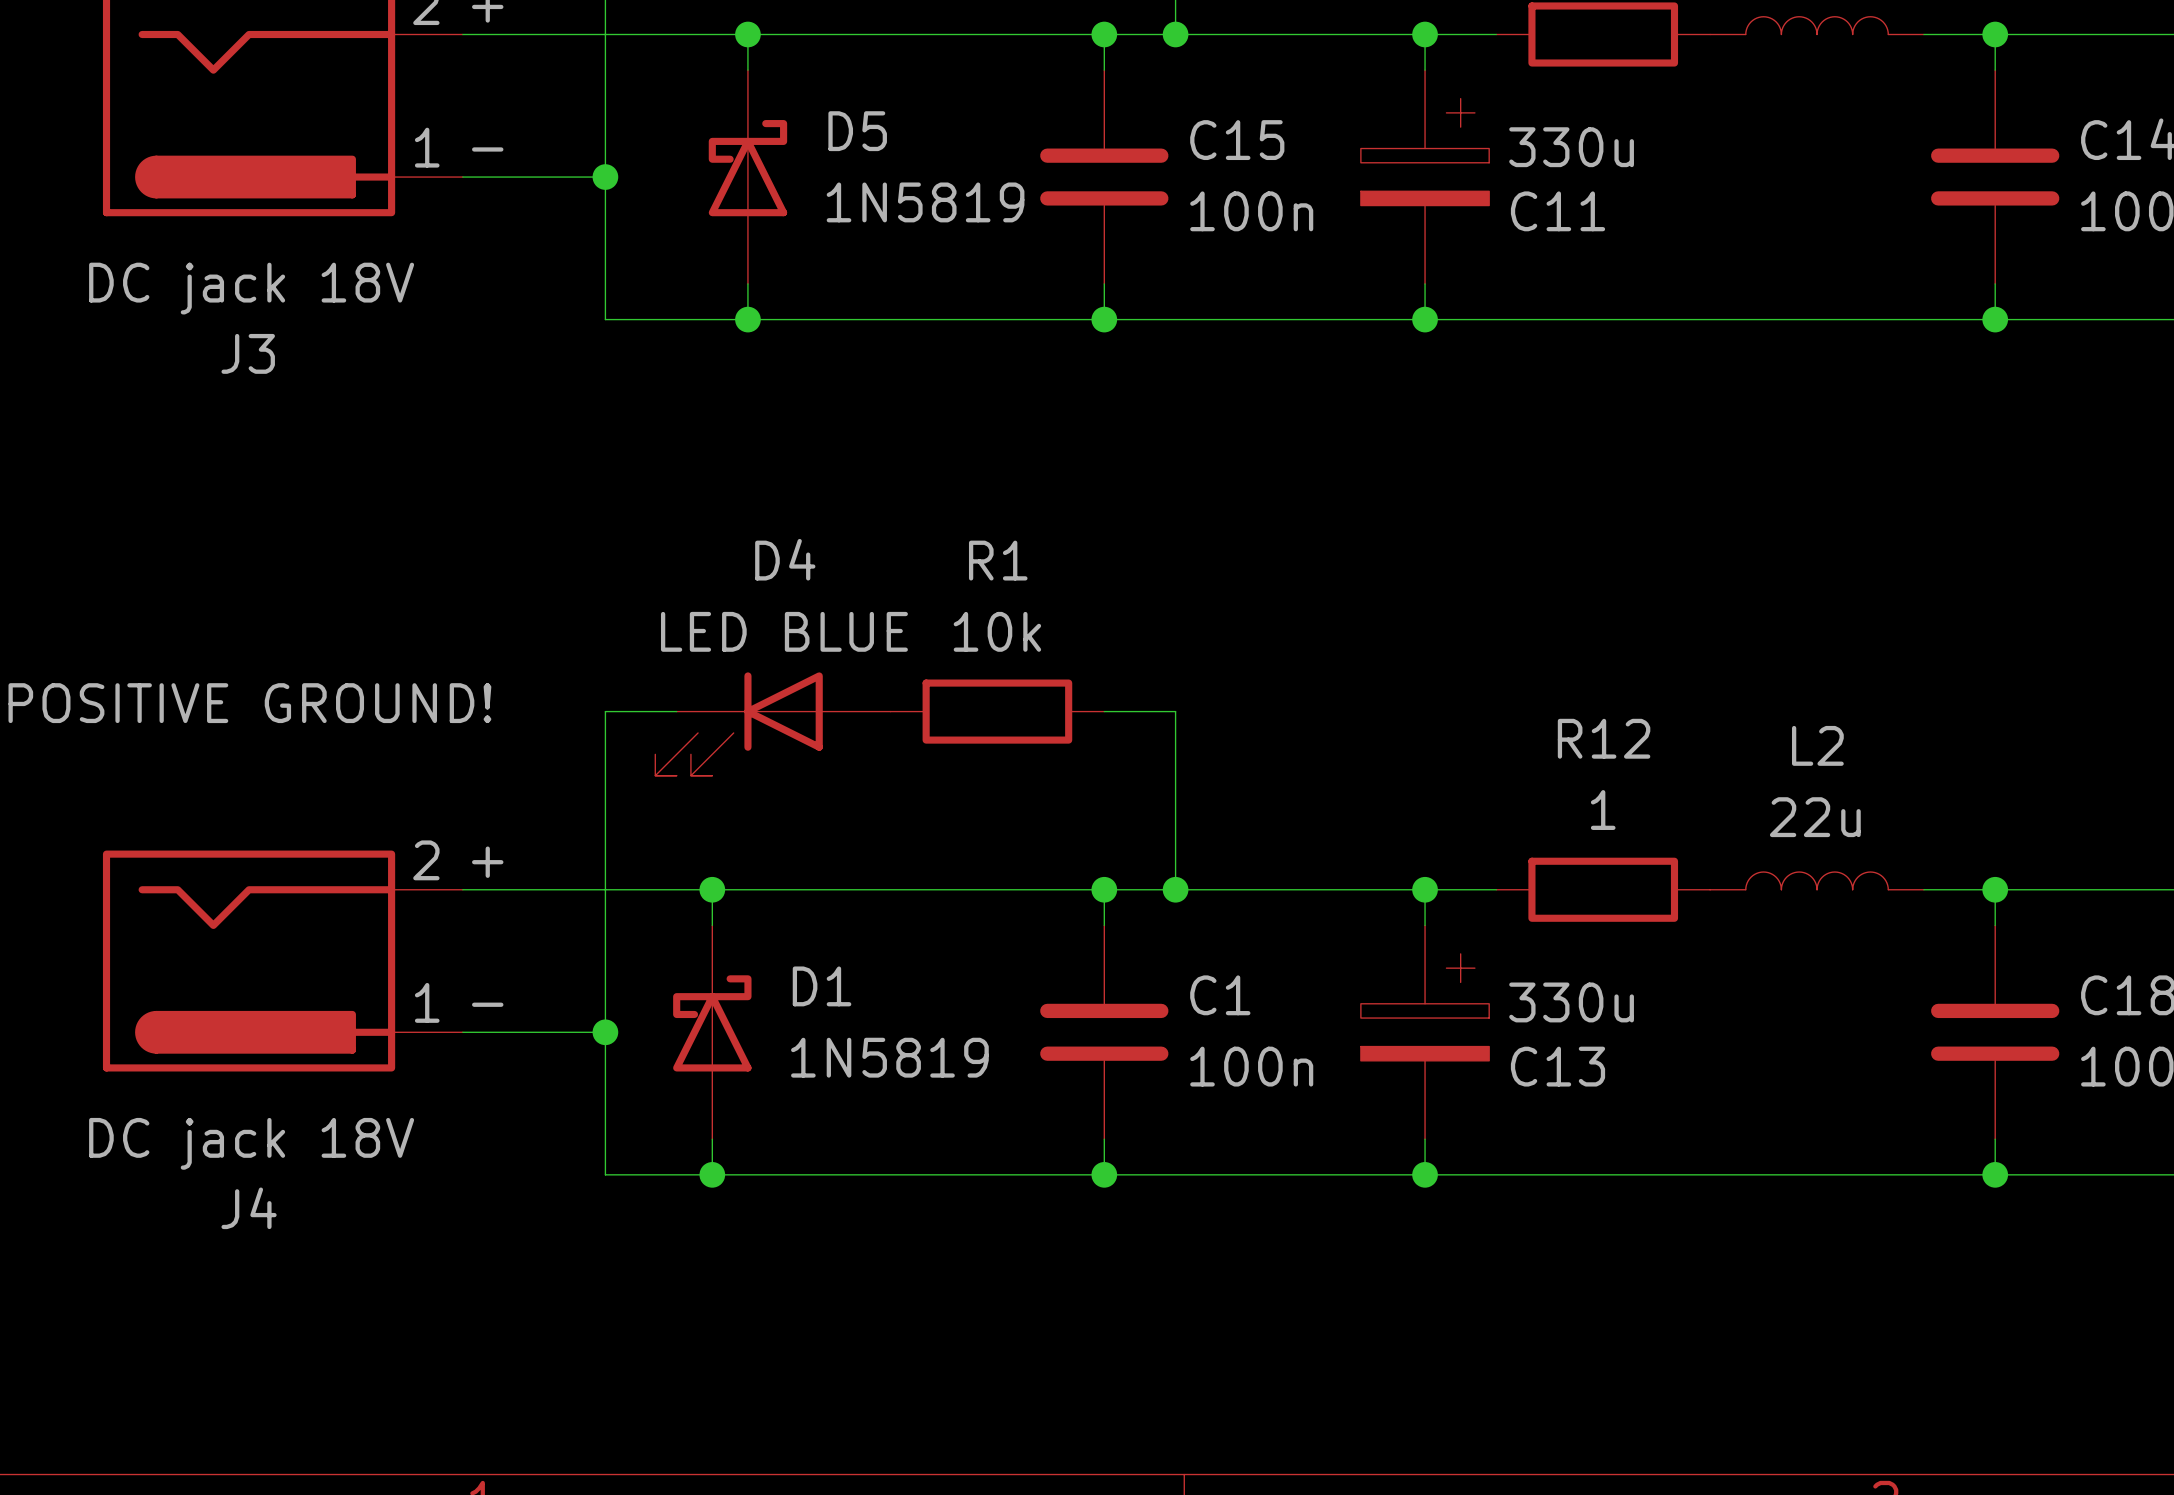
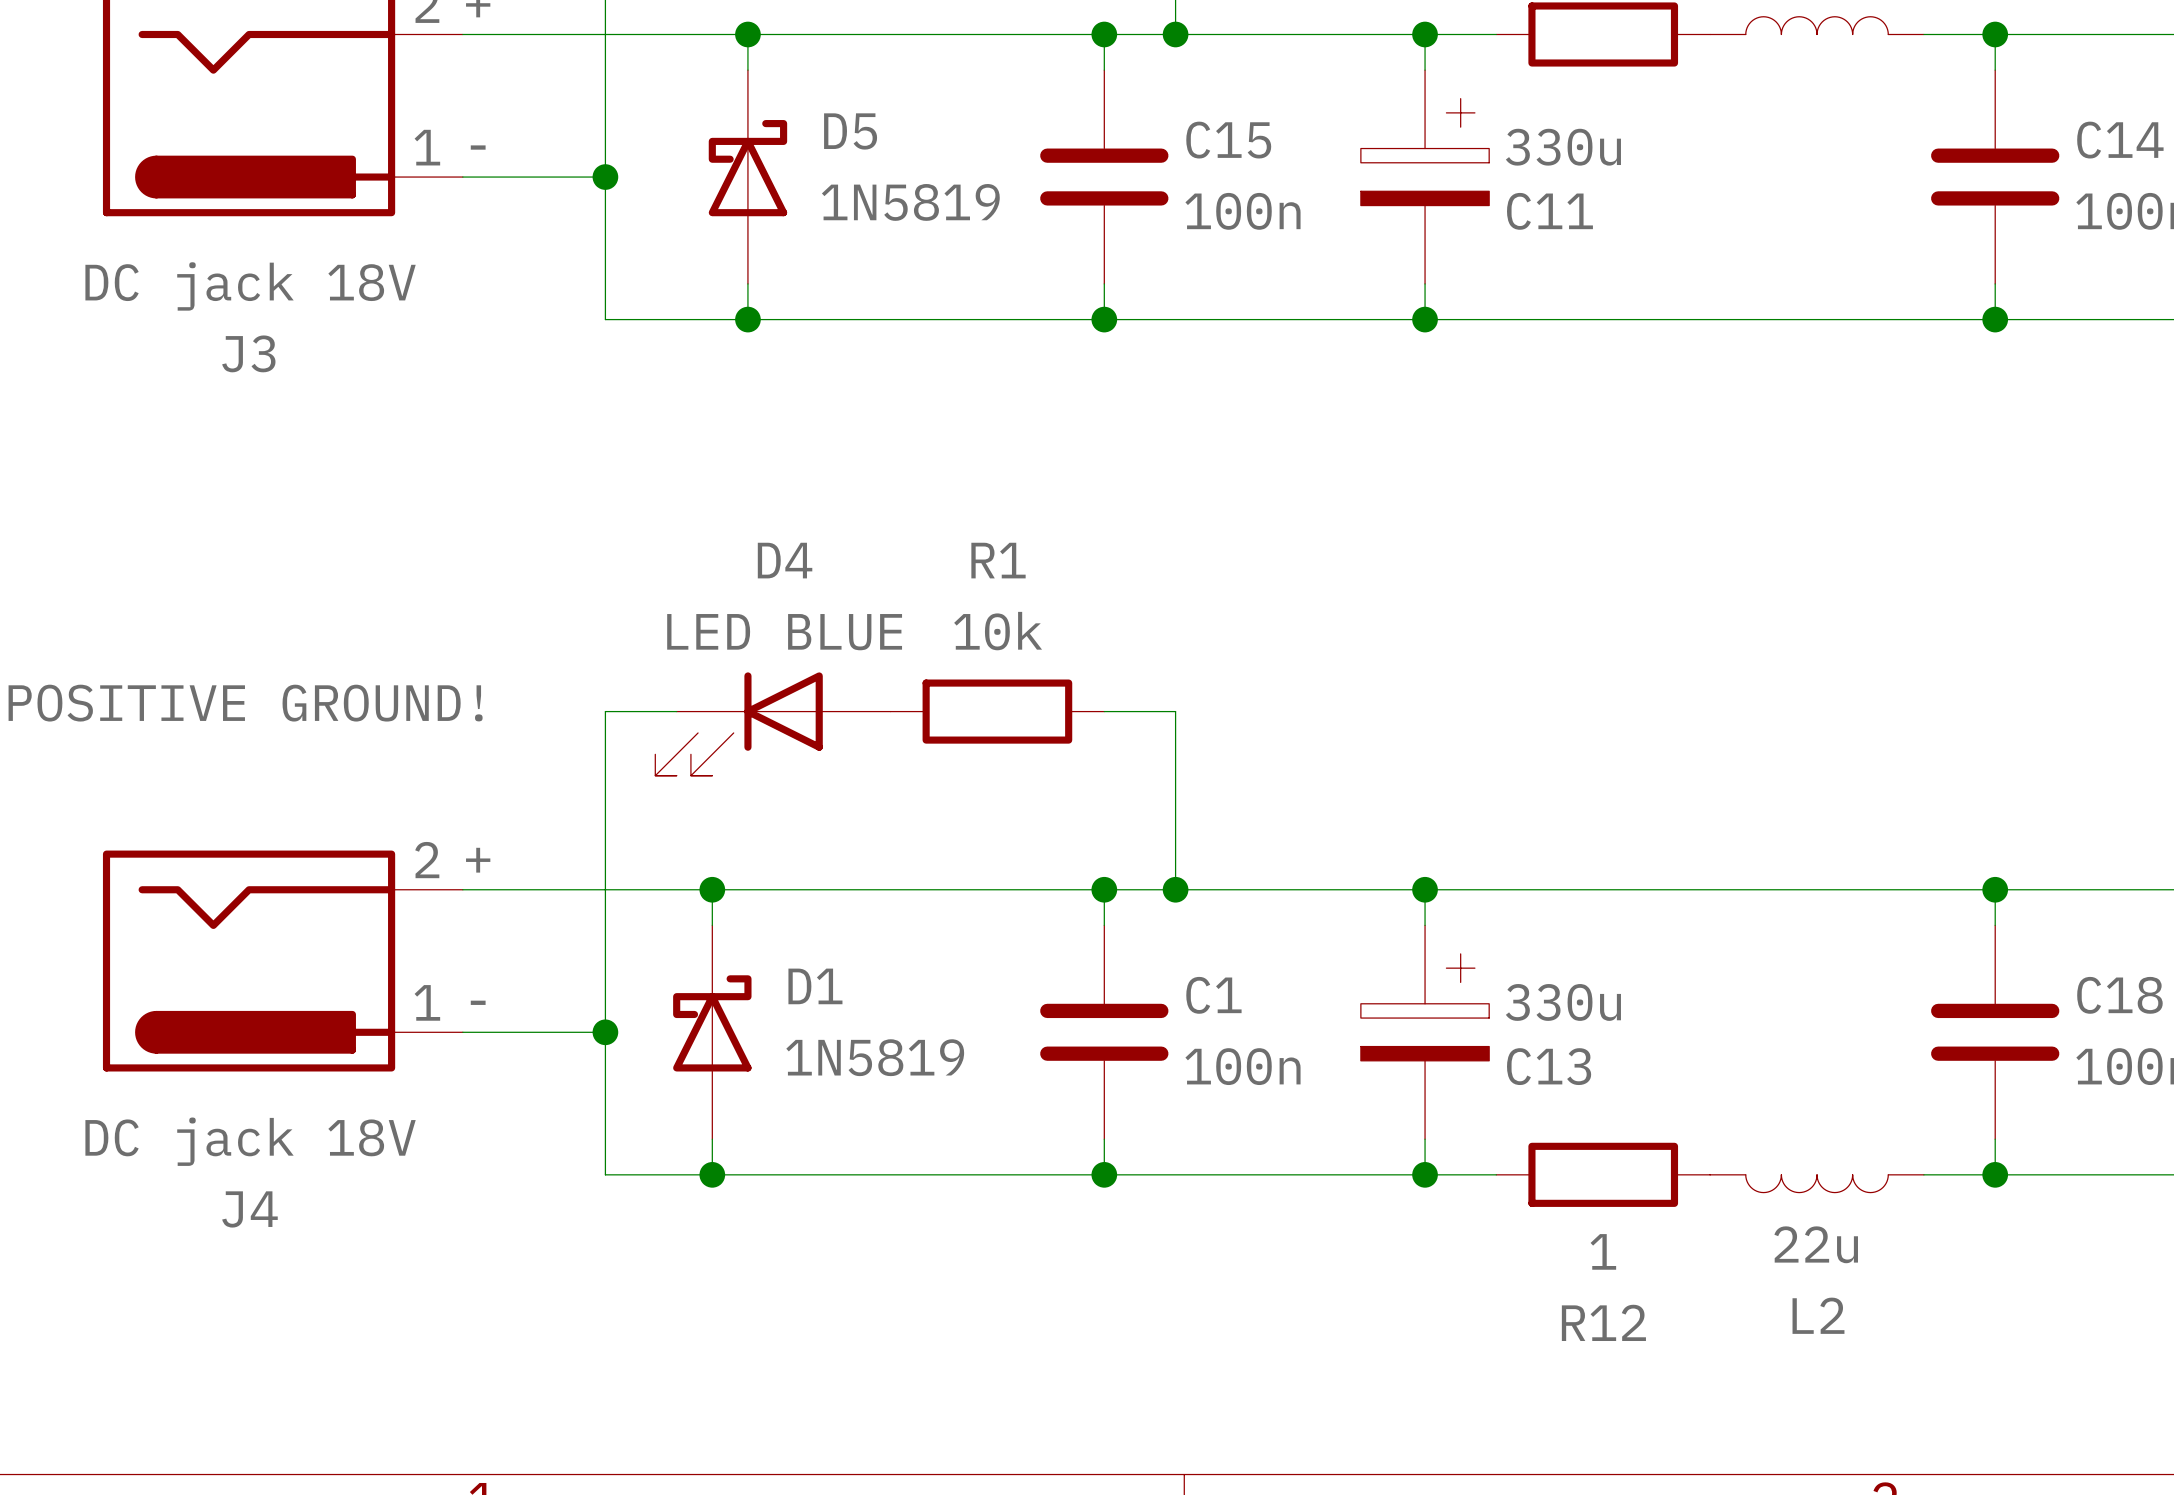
R12 name position: R12 (1604, 738) -> R12 (1603, 1322)
R12 value position: 1 (1603, 810) -> 1 (1603, 1251)
L2 rotation: 0° (1817, 880) -> 180° (1817, 1183)
L2 position: (1817, 880) -> (1817, 1183)
R12 position: (1603, 889) -> (1603, 1174)
wire: (1496, 1174) (1923, 1174) -> (1496, 889) (1923, 889)

